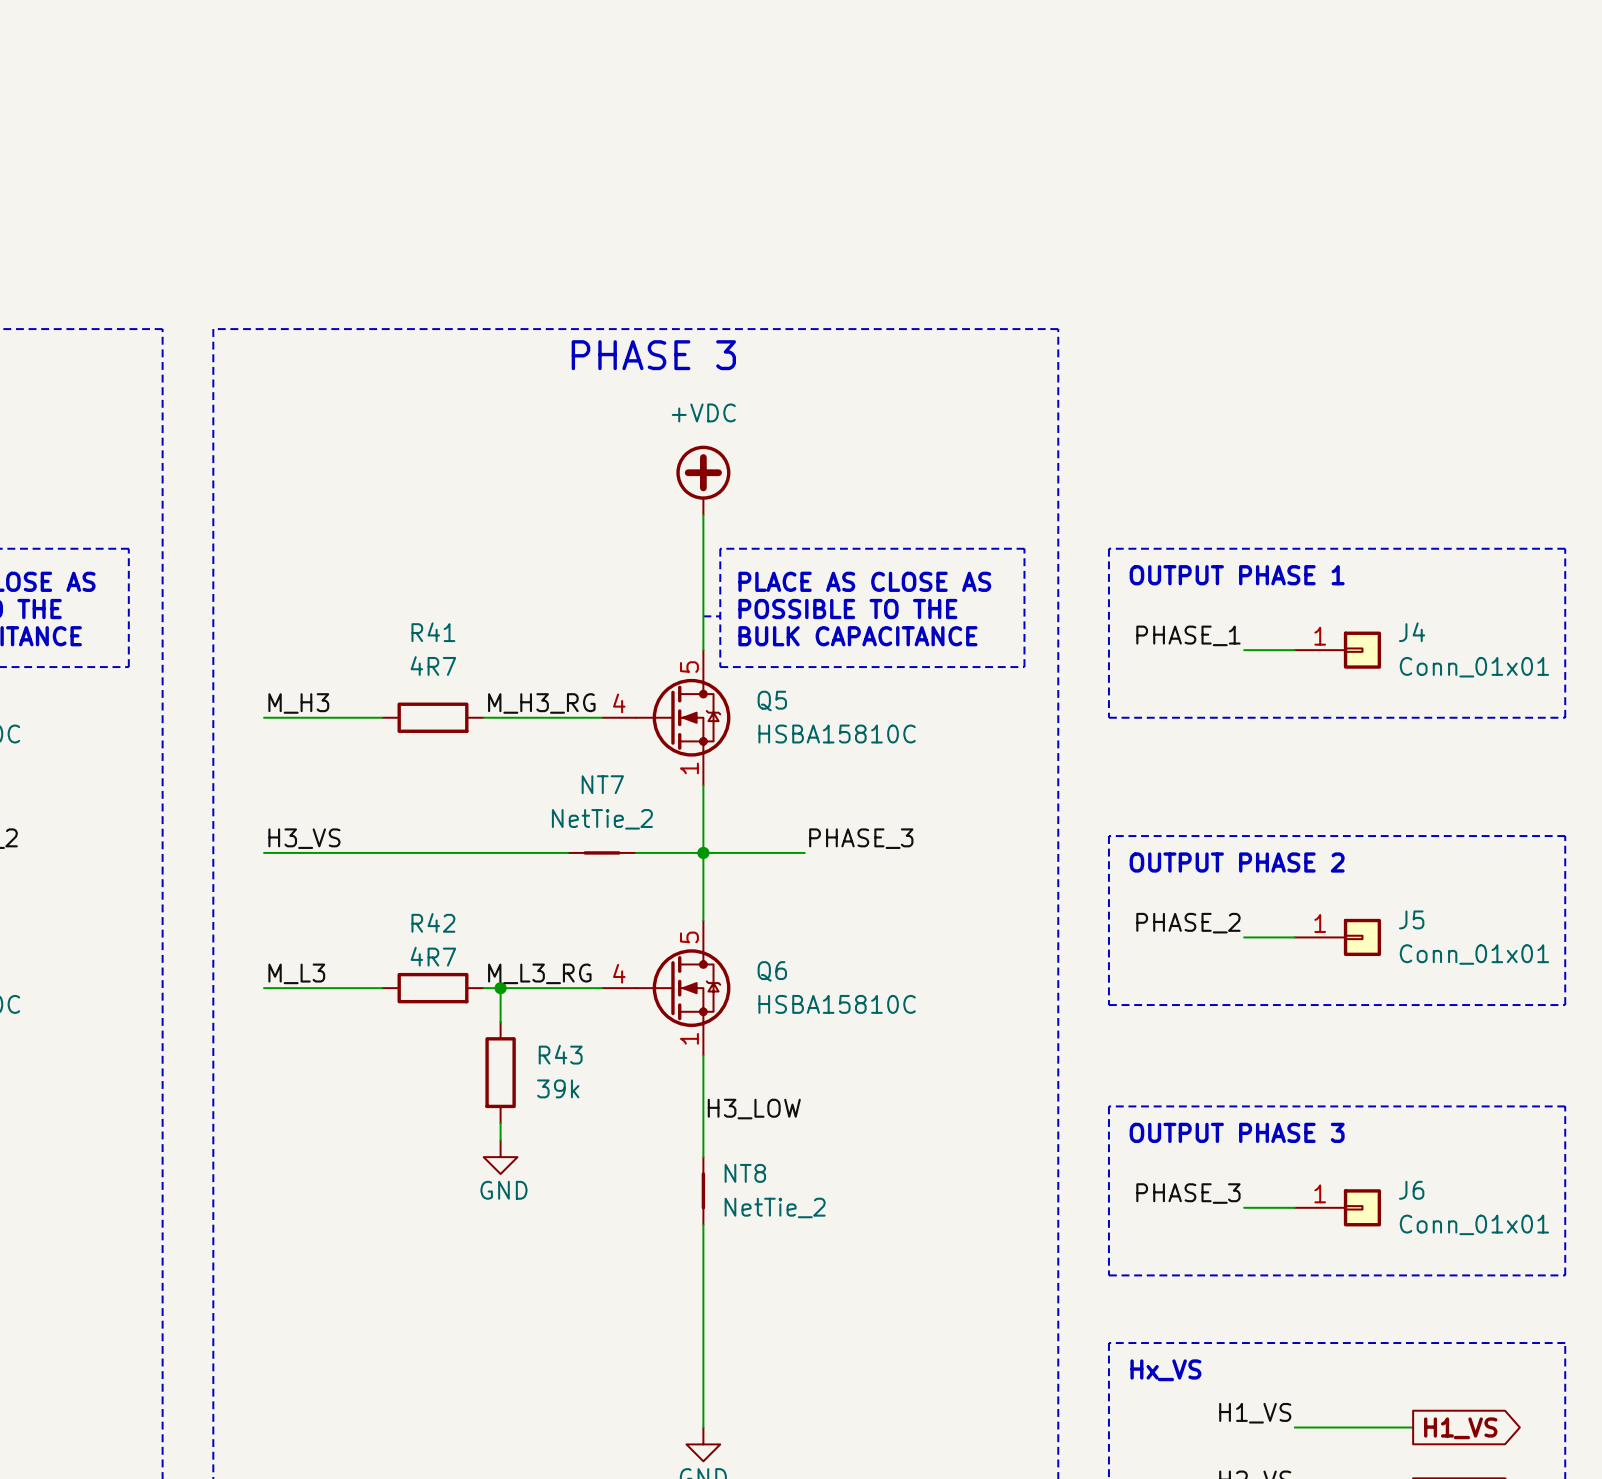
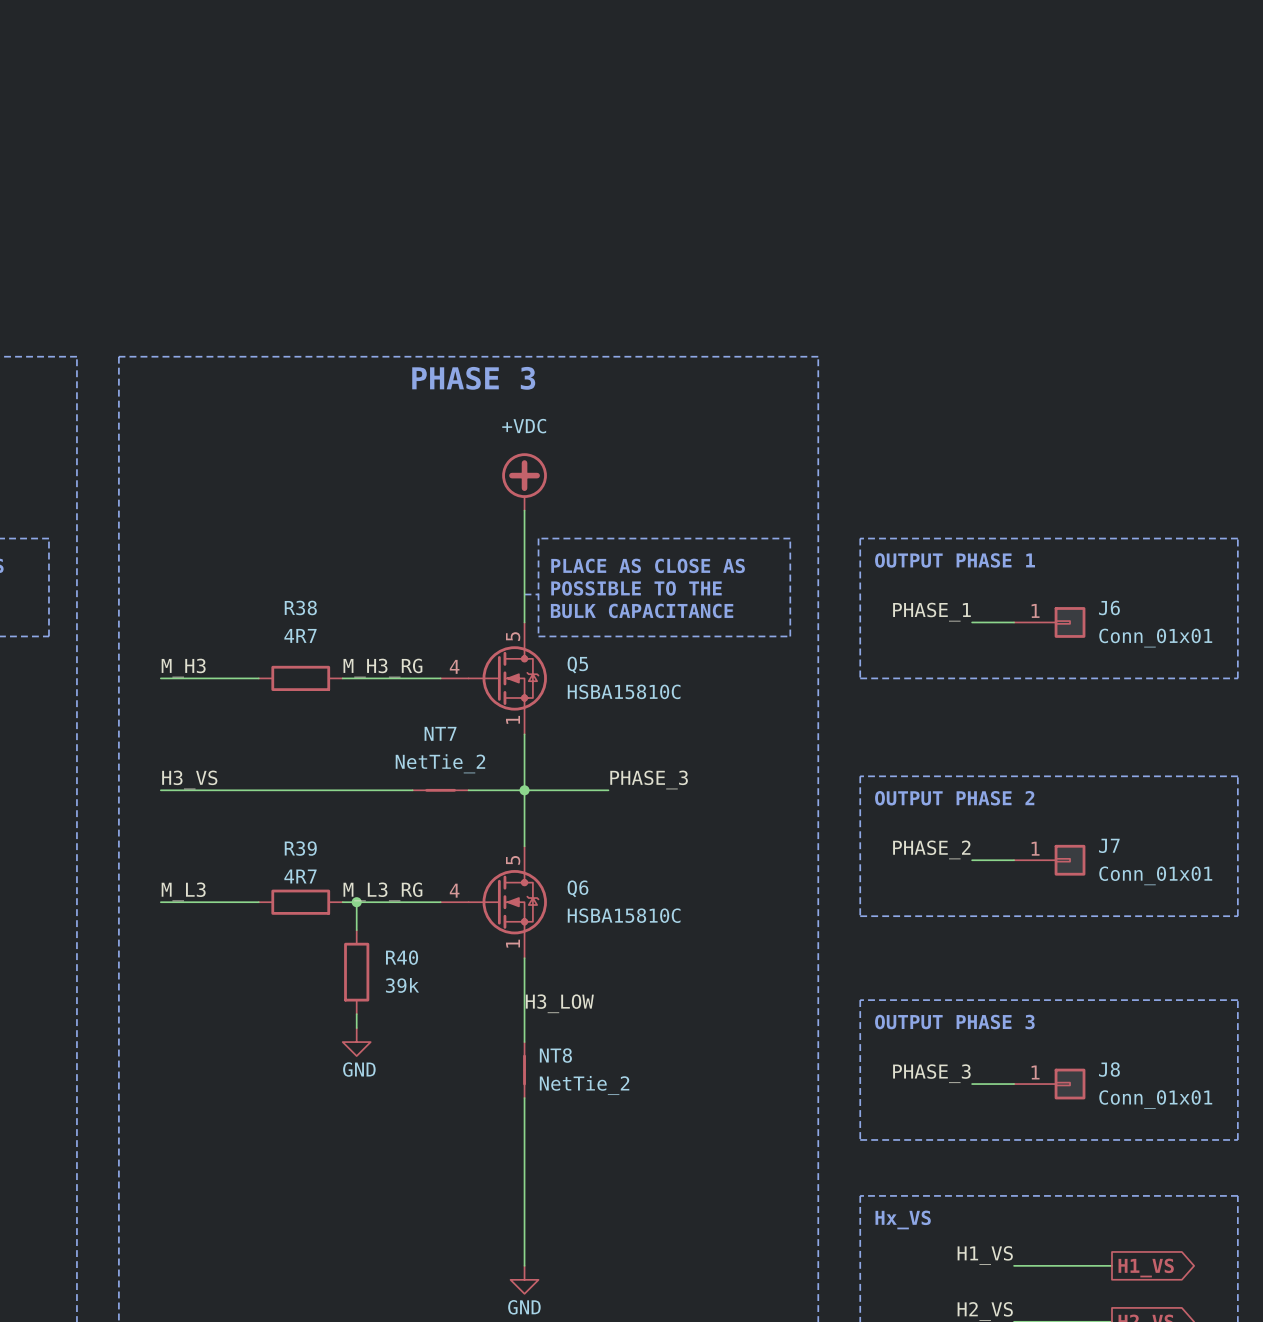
R41 name: R41 (433, 632) -> R38 (300, 607)
J4 name: J4 (1412, 632) -> J6 (1109, 607)
J5 name: J5 (1411, 919) -> J7 (1109, 845)
R42 name: R42 (433, 922) -> R39 (300, 848)
R43 name: R43 (560, 1054) -> R40 (402, 957)
J6 name: J6 (1411, 1190) -> J8 (1109, 1069)

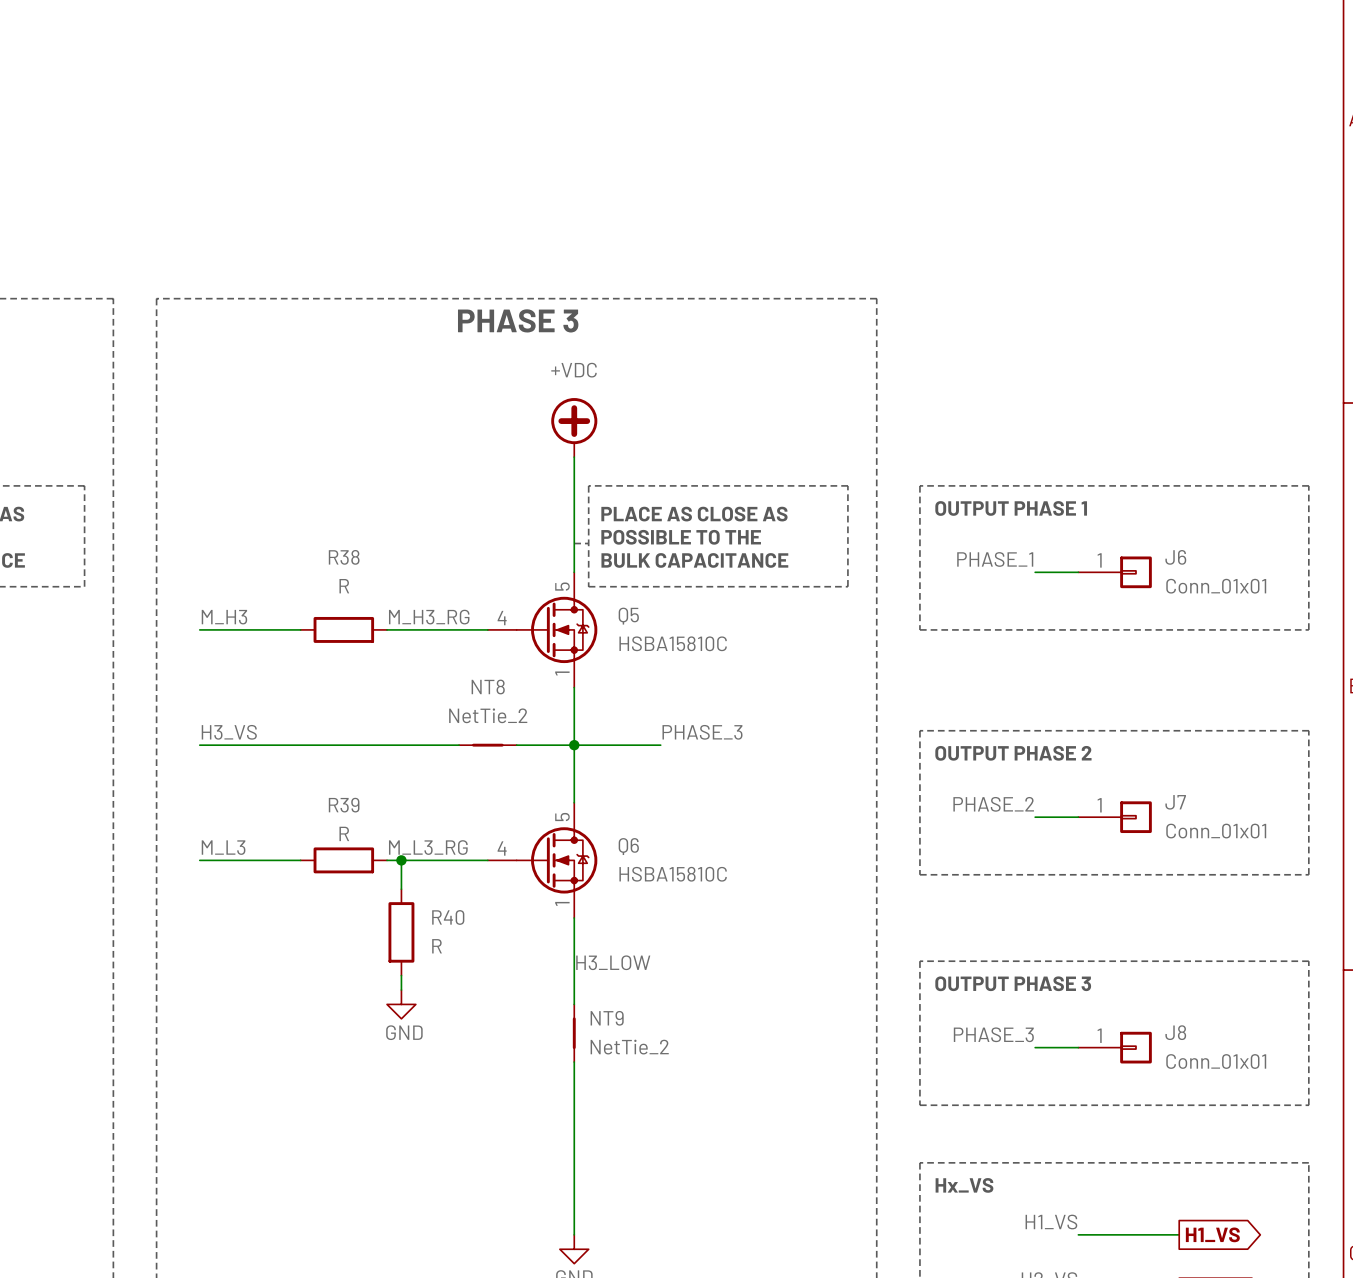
R38 value: 4R7 (300, 635) -> R (344, 586)
NT7 name: NT7 (440, 733) -> NT8 (488, 686)
R39 value: 4R7 (300, 876) -> R (344, 833)
R40 value: 39k (402, 985) -> R (437, 946)
NT8 name: NT8 (555, 1055) -> NT9 (607, 1018)

